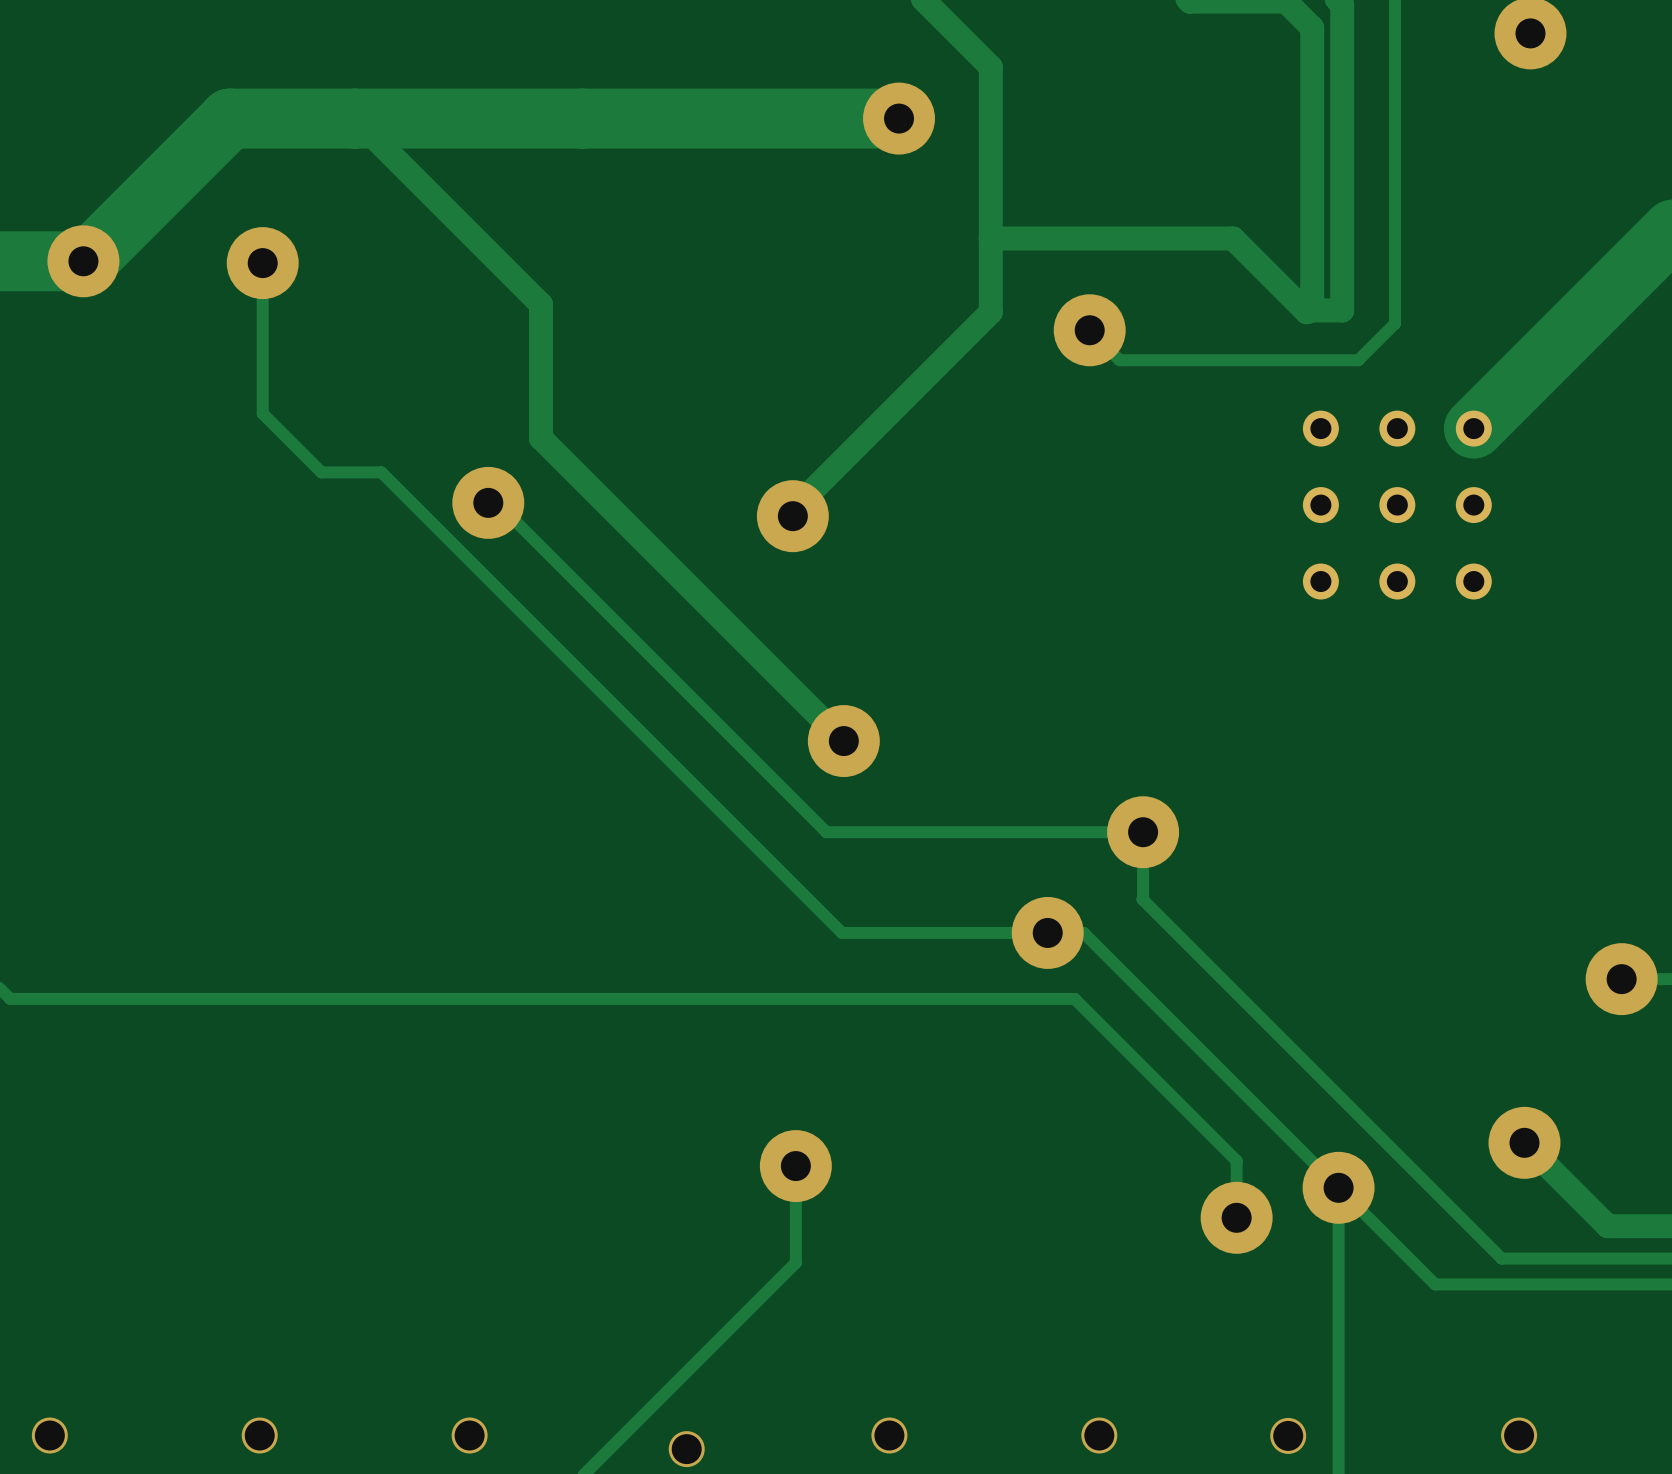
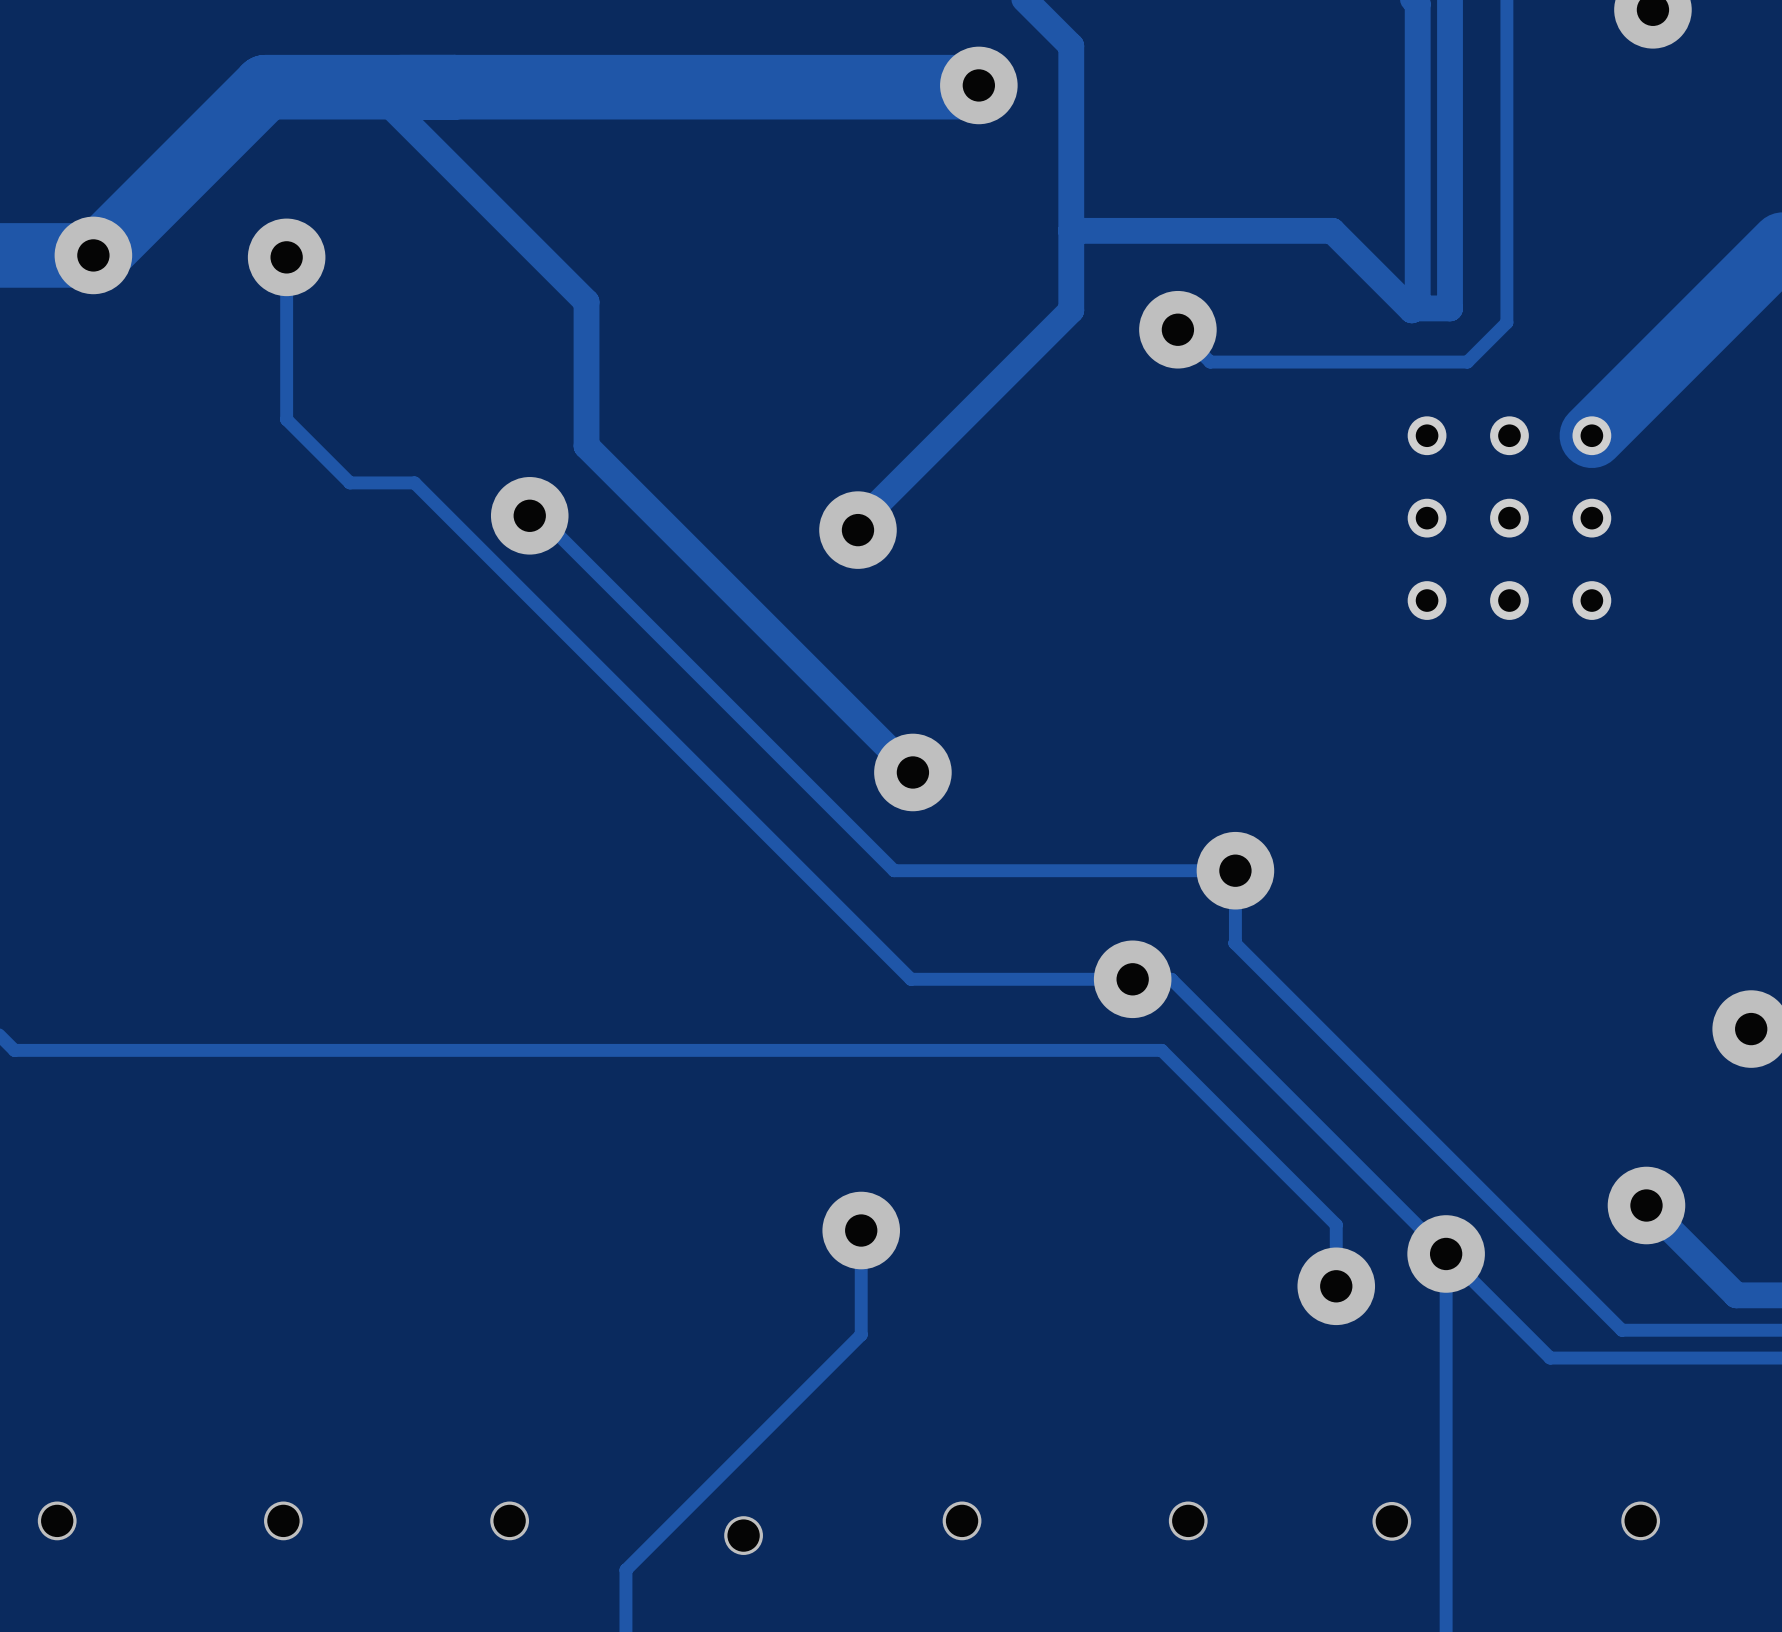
track: (899, 118) (229, 118) -> (978, 85) (977, 87) (265, 87) (251, 101)
via position: (899, 118) -> (978, 85)

